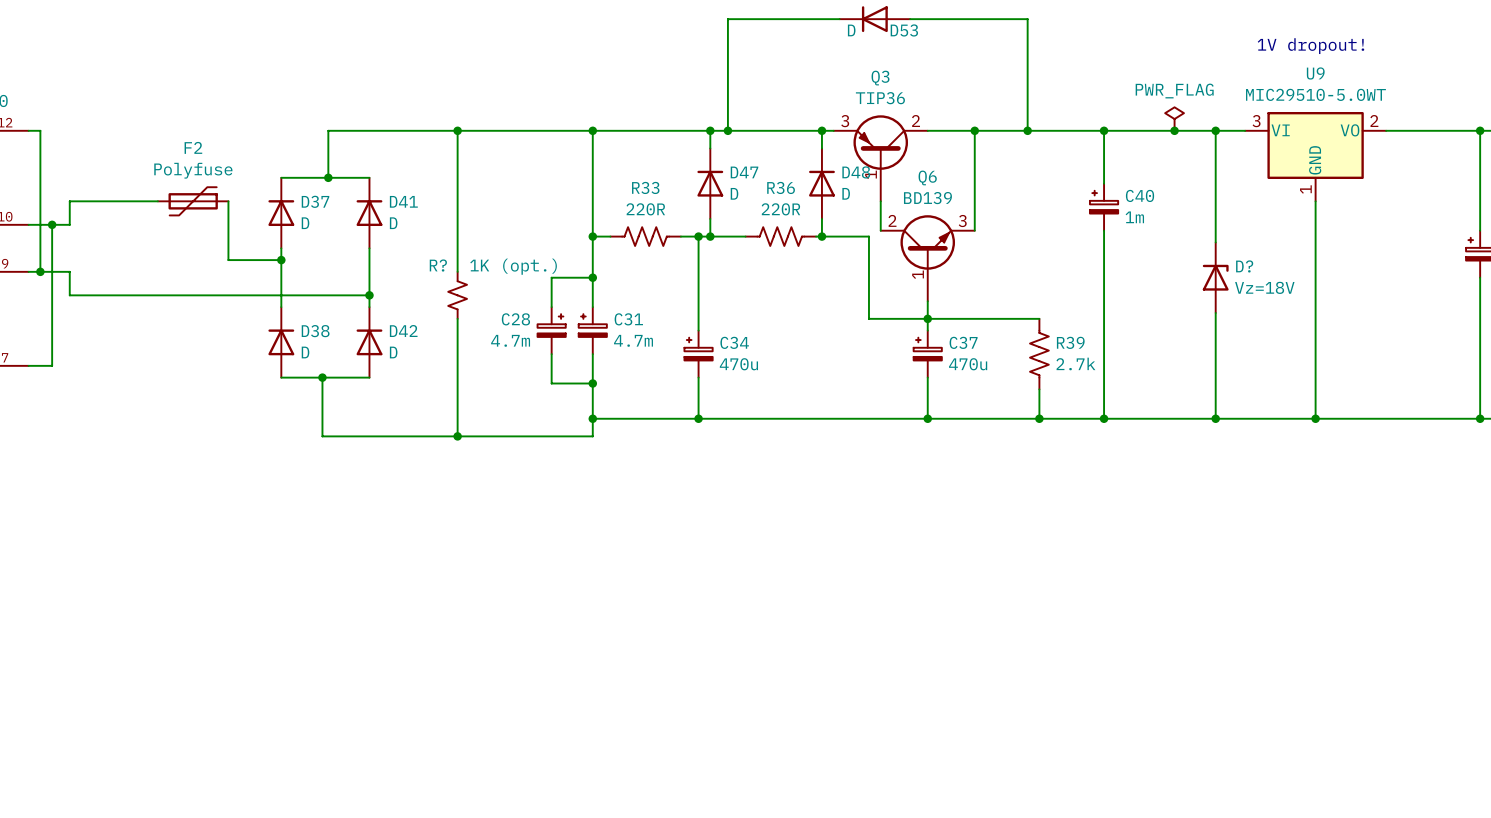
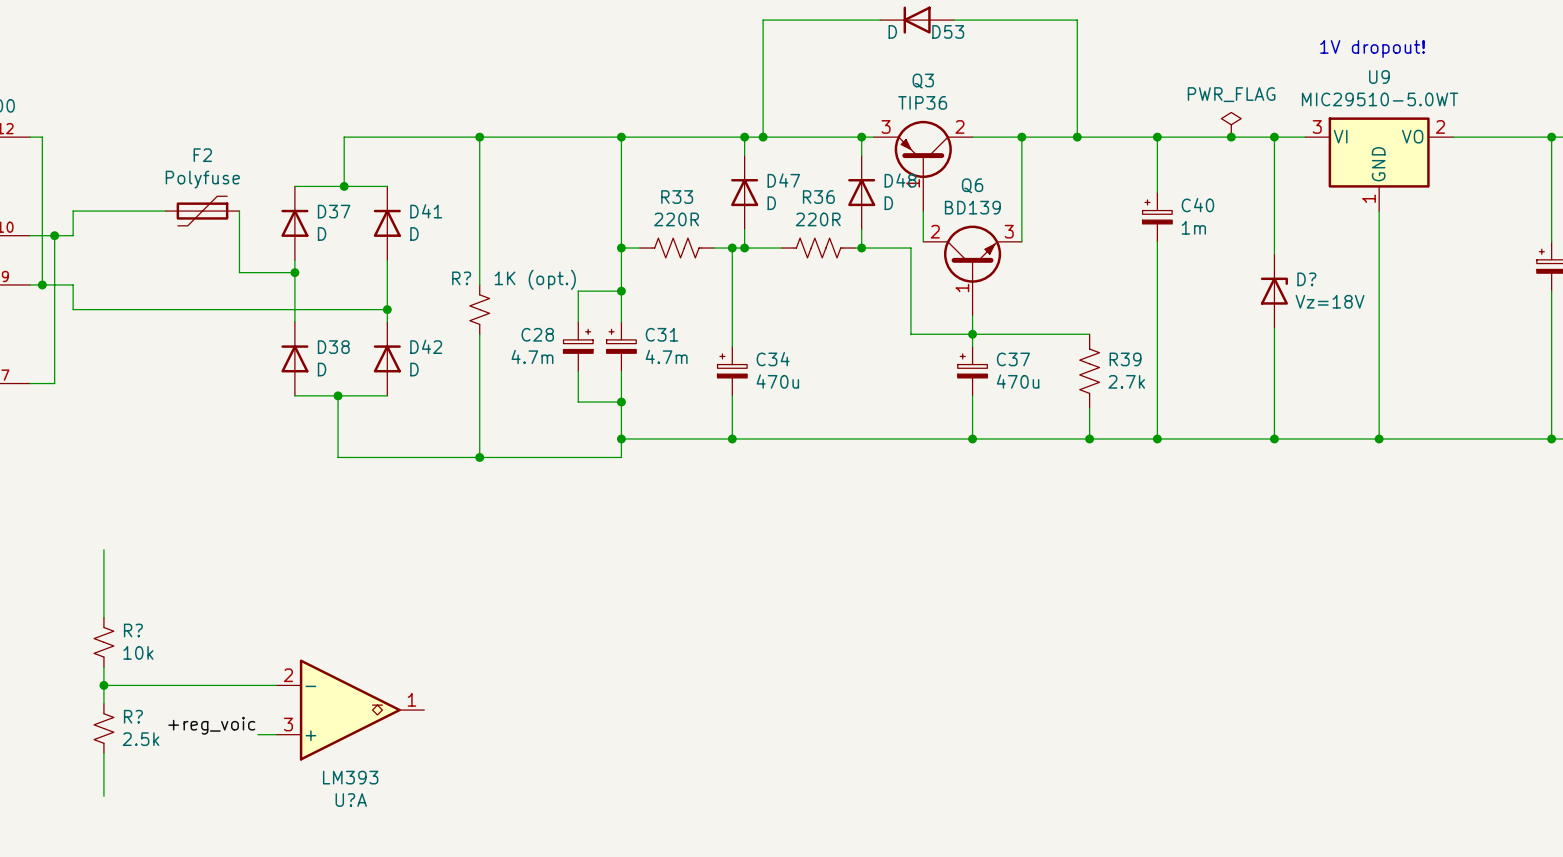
wire: none -> (103, 549) (103, 617)
R?: none -> 10k (103, 642)
wire: none -> (103, 666) (103, 703)
wire: none -> (103, 685) (276, 685)
junction: none -> (103, 685)
U?A: none -> LM393 (350, 710)
label: none -> +reg_voic (211, 725)
R?: none -> 2.5k (103, 728)
wire: none -> (257, 734) (276, 734)
wire: none -> (103, 753) (103, 796)

